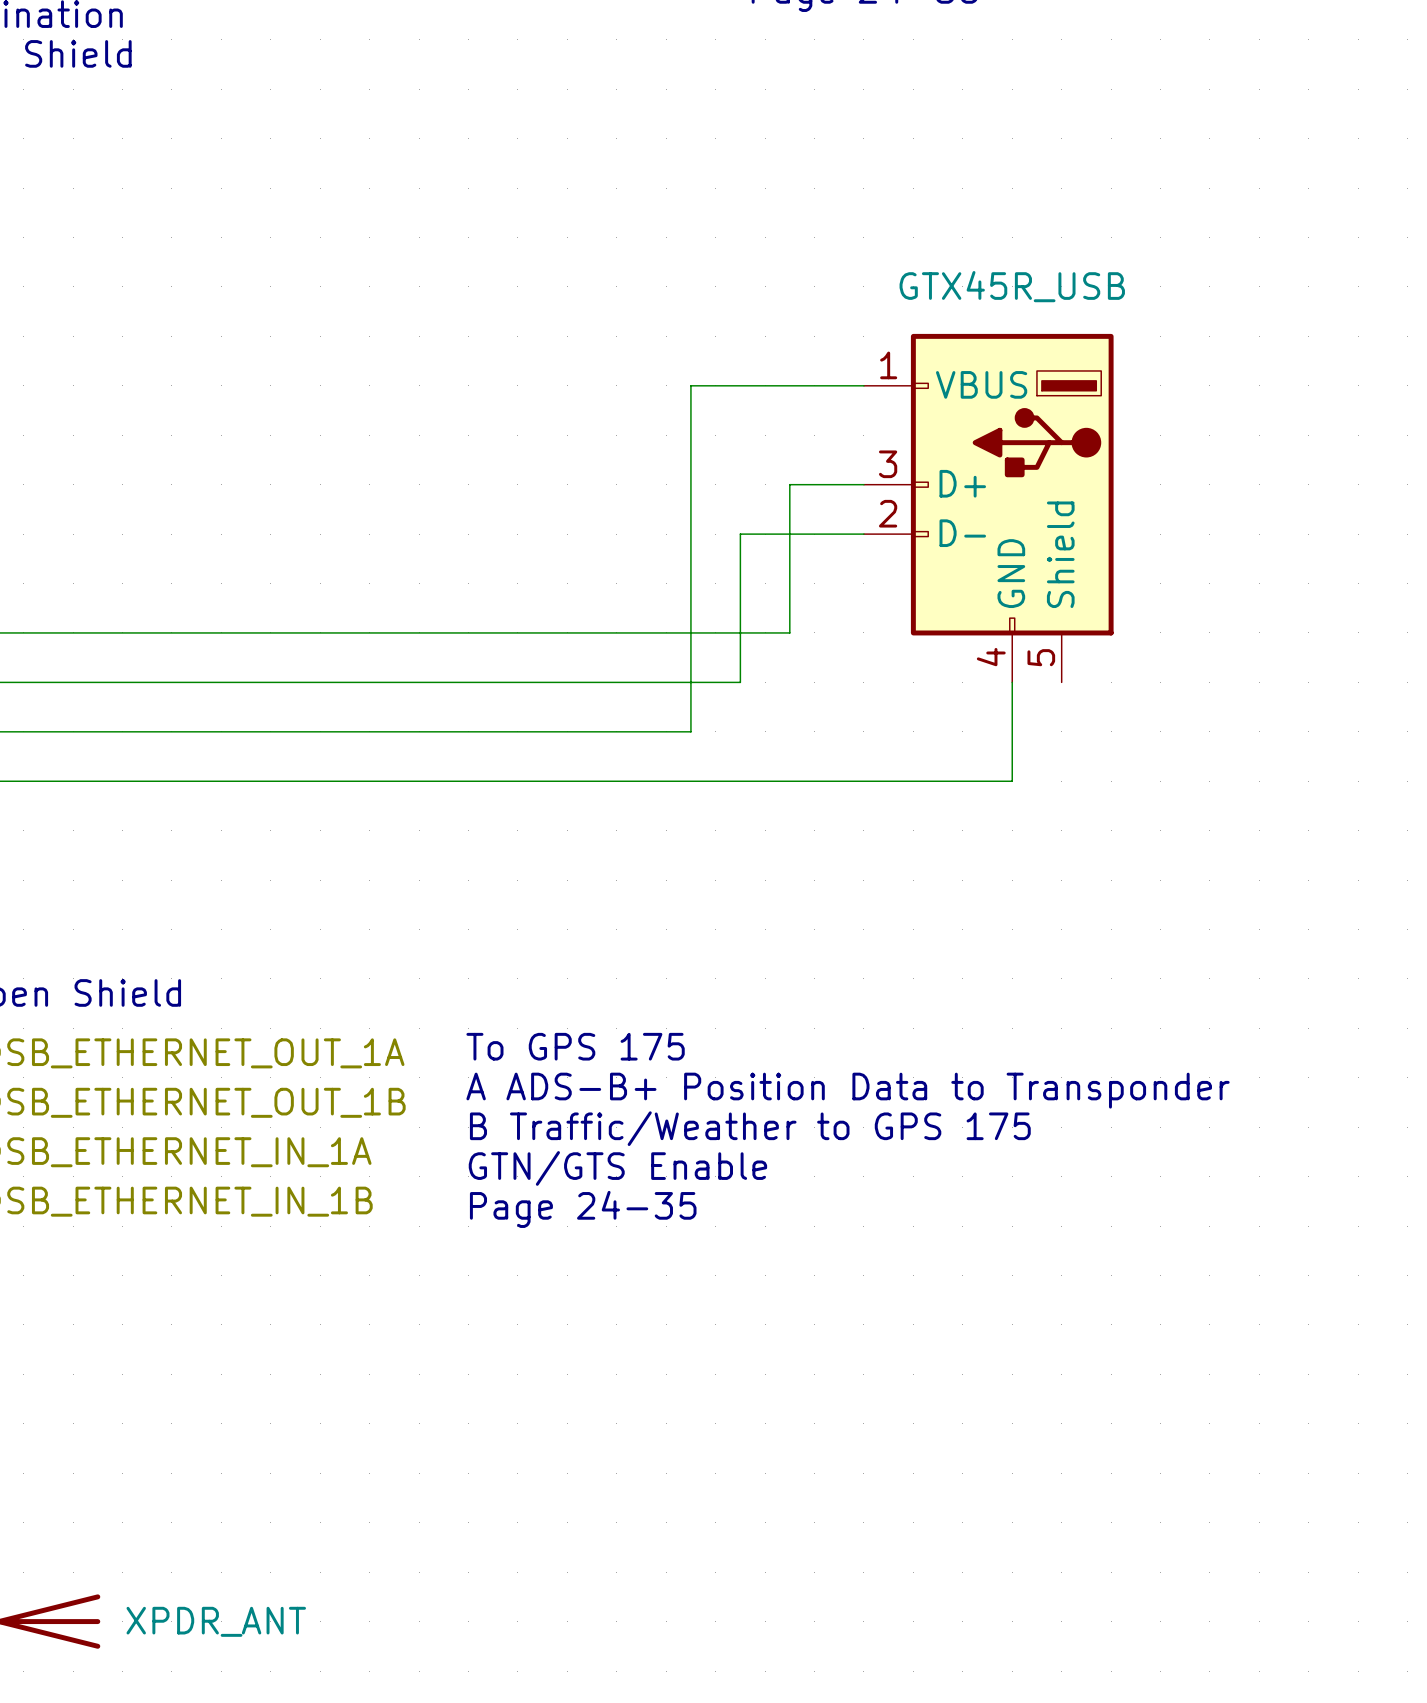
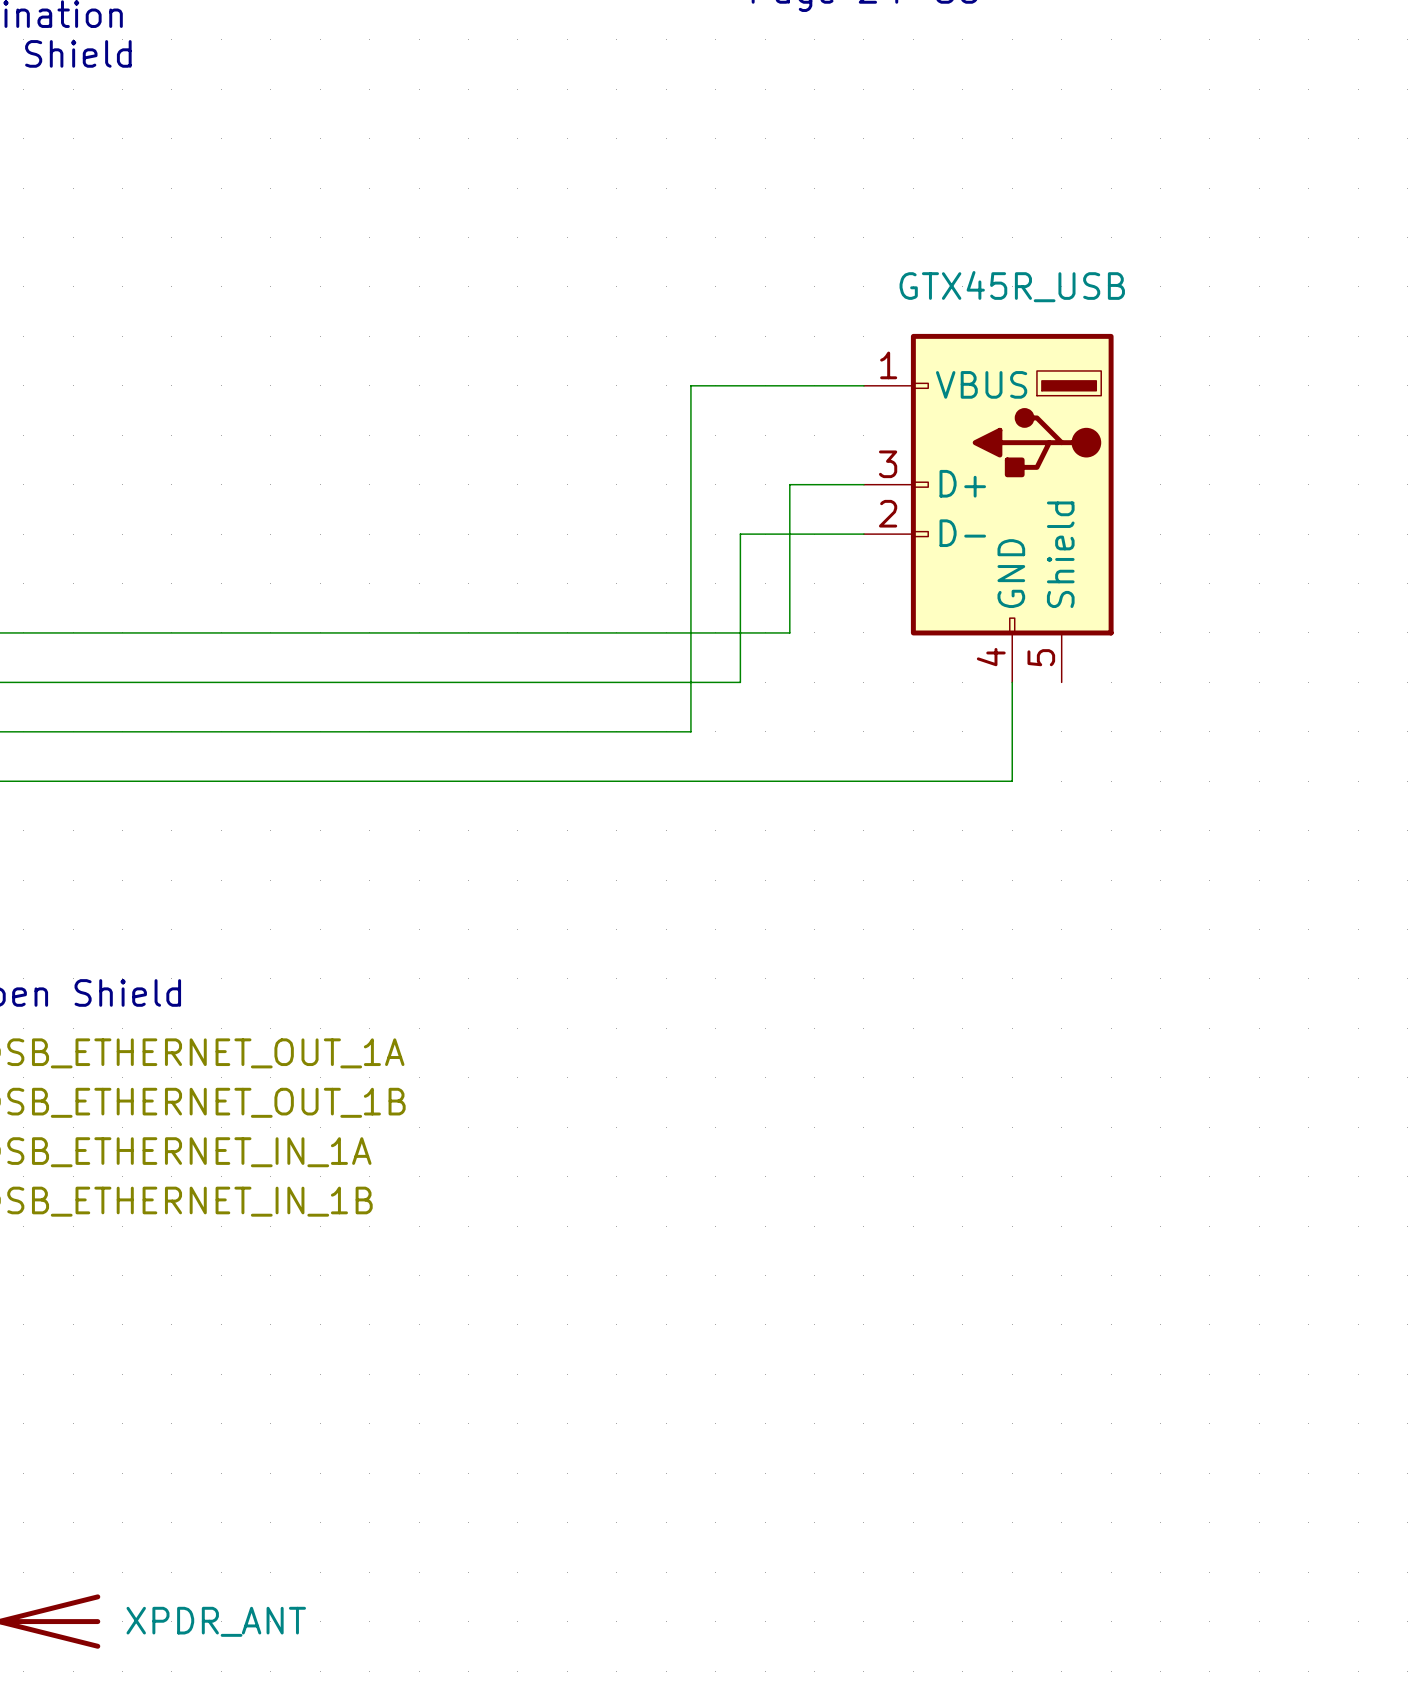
text: To GPS 175 (575, 1046) -> none
text: A ADS-B+ Position Data to Transponder (848, 1090) -> none
text: B Traffic/Weather to GPS 175 (750, 1128) -> none
text: GTN/GTS Enable (617, 1168) -> none
text: Page 24-35 (583, 1209) -> none

